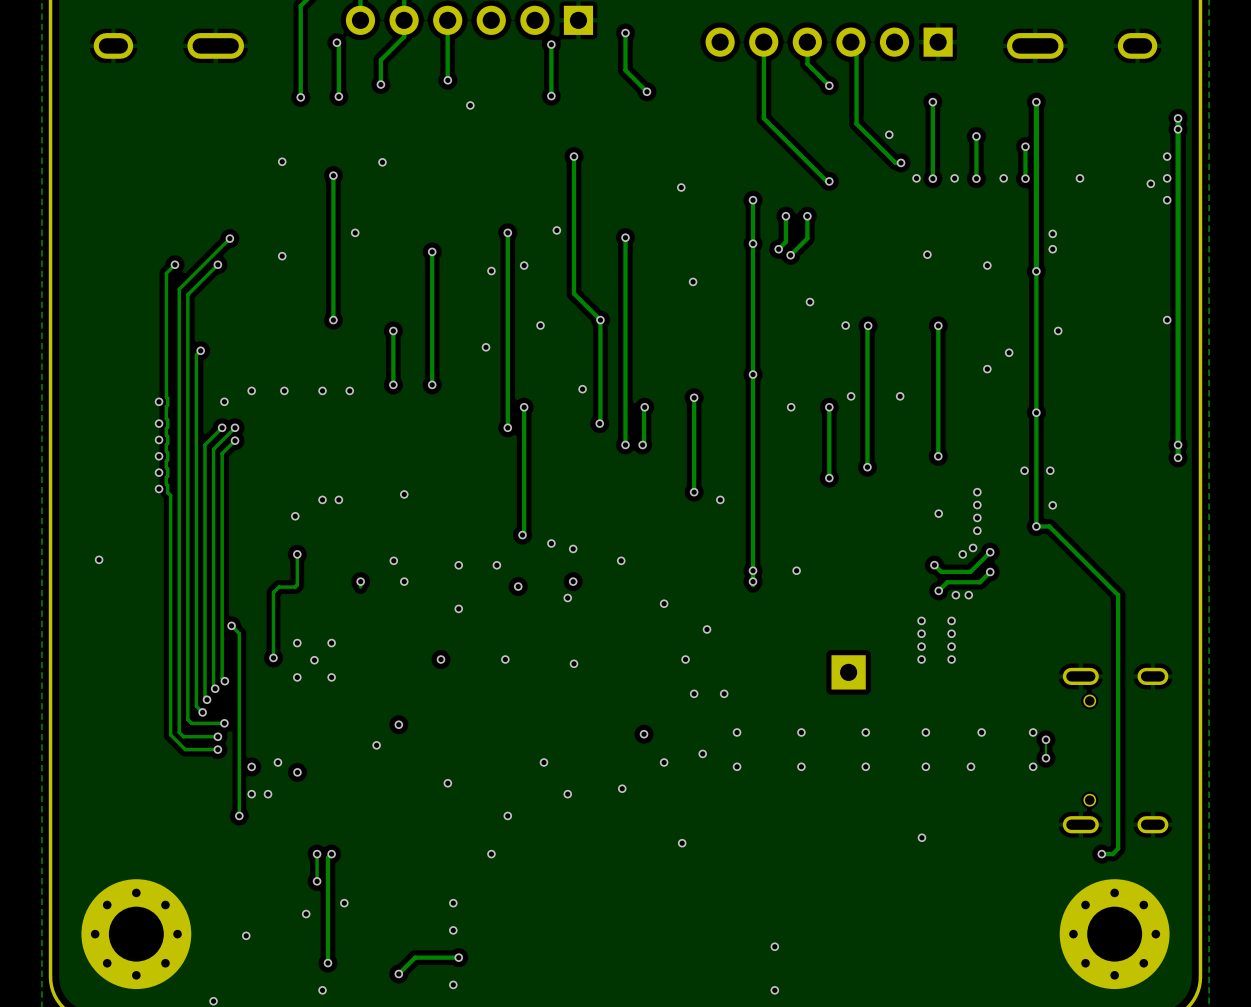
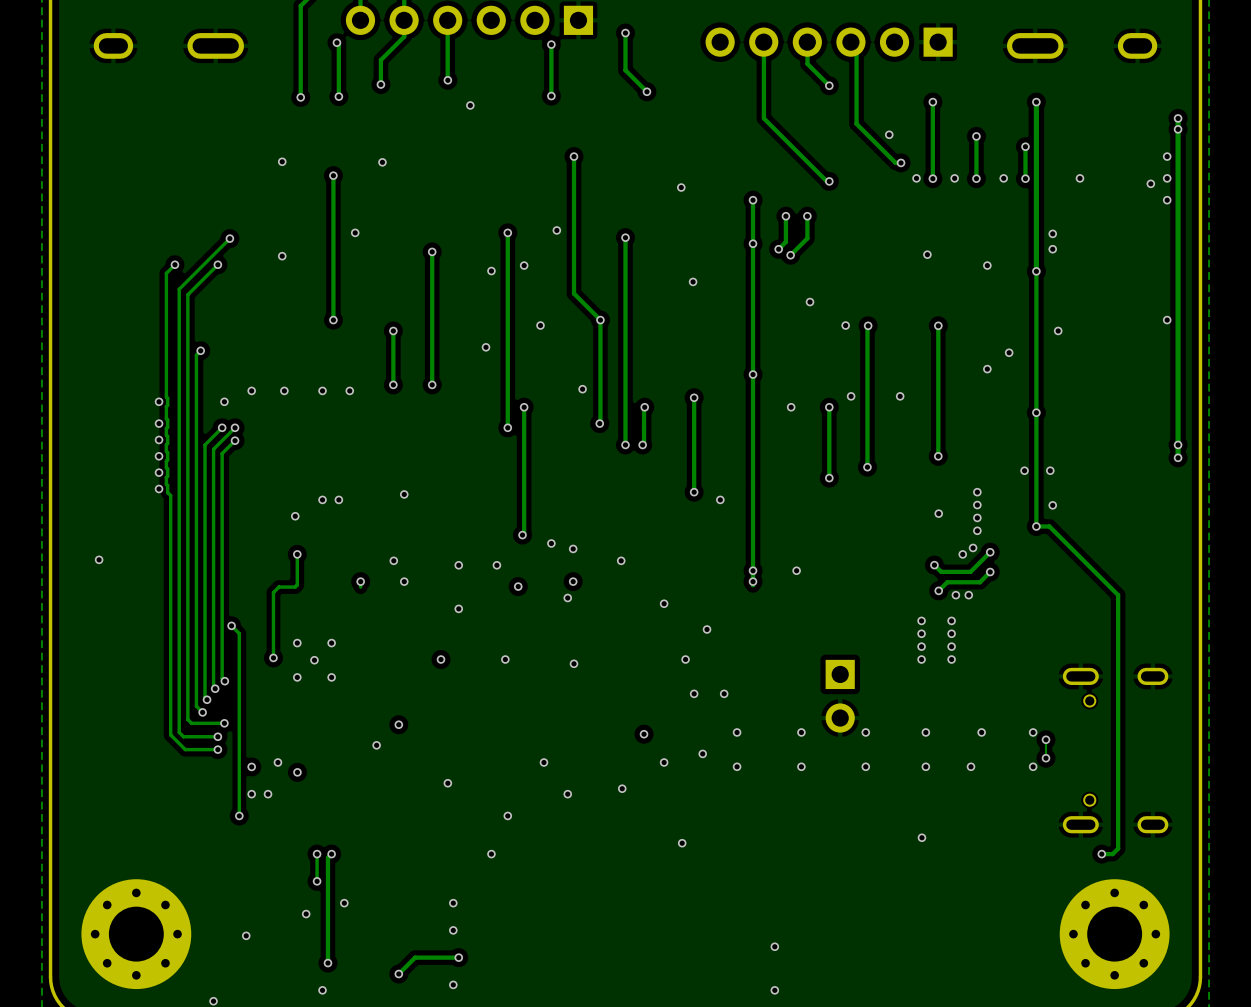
part: (848, 672) -> none
part: none -> (840, 696)

